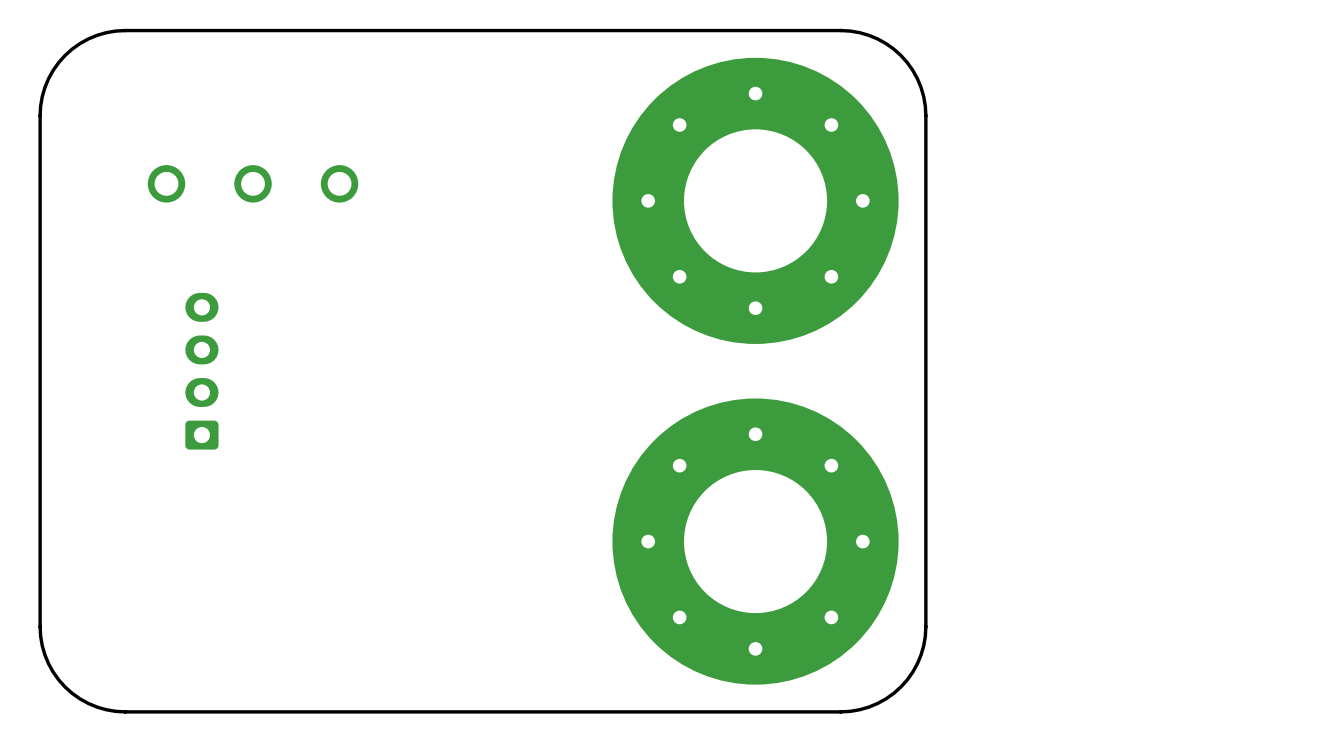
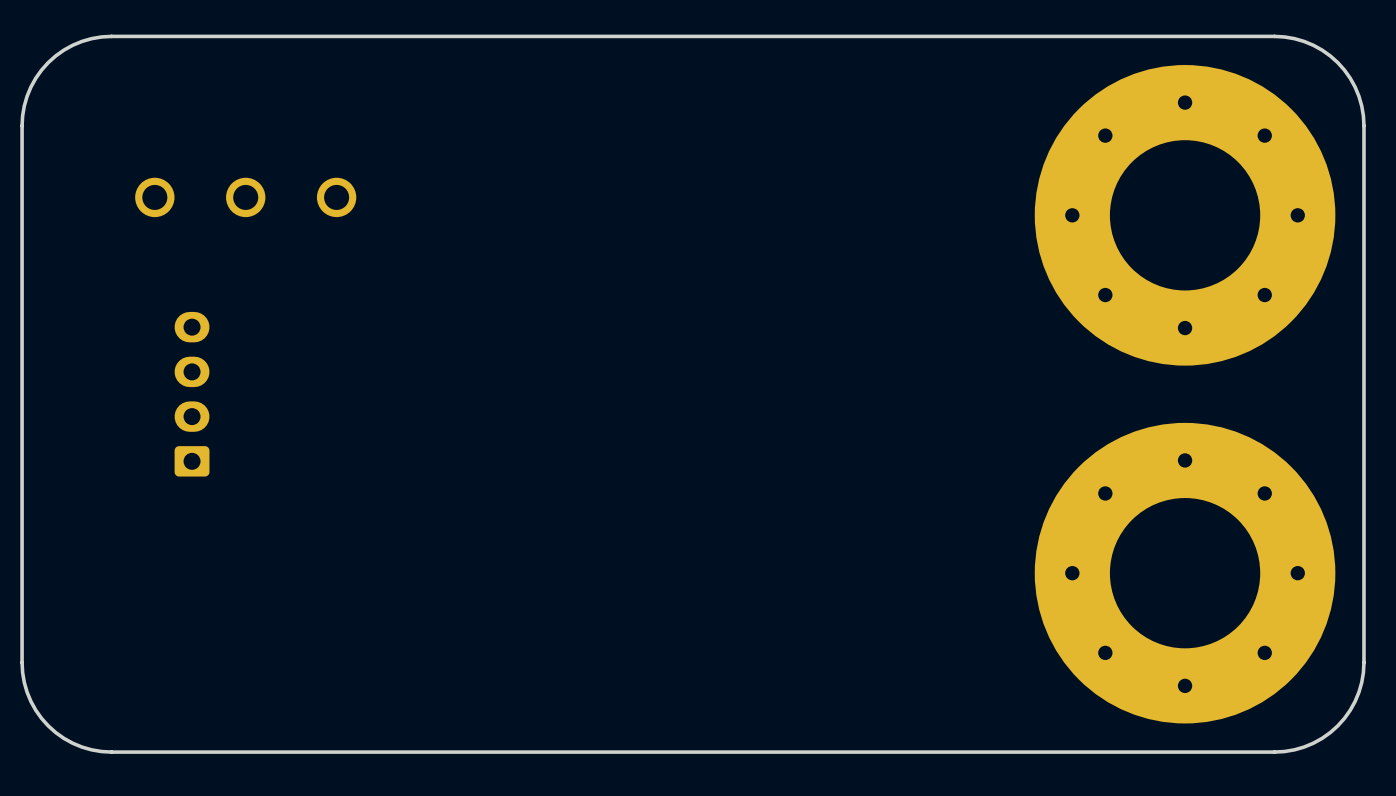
board edge: (840, 30) (868, 35) (886, 43) (900, 55) (912, 70) (921, 87) (925, 115) (925, 636) (921, 654) (912, 672) (893, 693) (868, 707) (840, 711) -> (863, 36) (1274, 36) (1294, 38) (1322, 50) (1344, 70) (1358, 96) (1363, 125) (1363, 662) (1358, 692) (1344, 718) (1322, 738) (1304, 747) (1284, 751) (863, 752)
part: (755, 200) -> none
part: none -> (1185, 215)
part: (755, 541) -> none
part: none -> (1185, 573)

